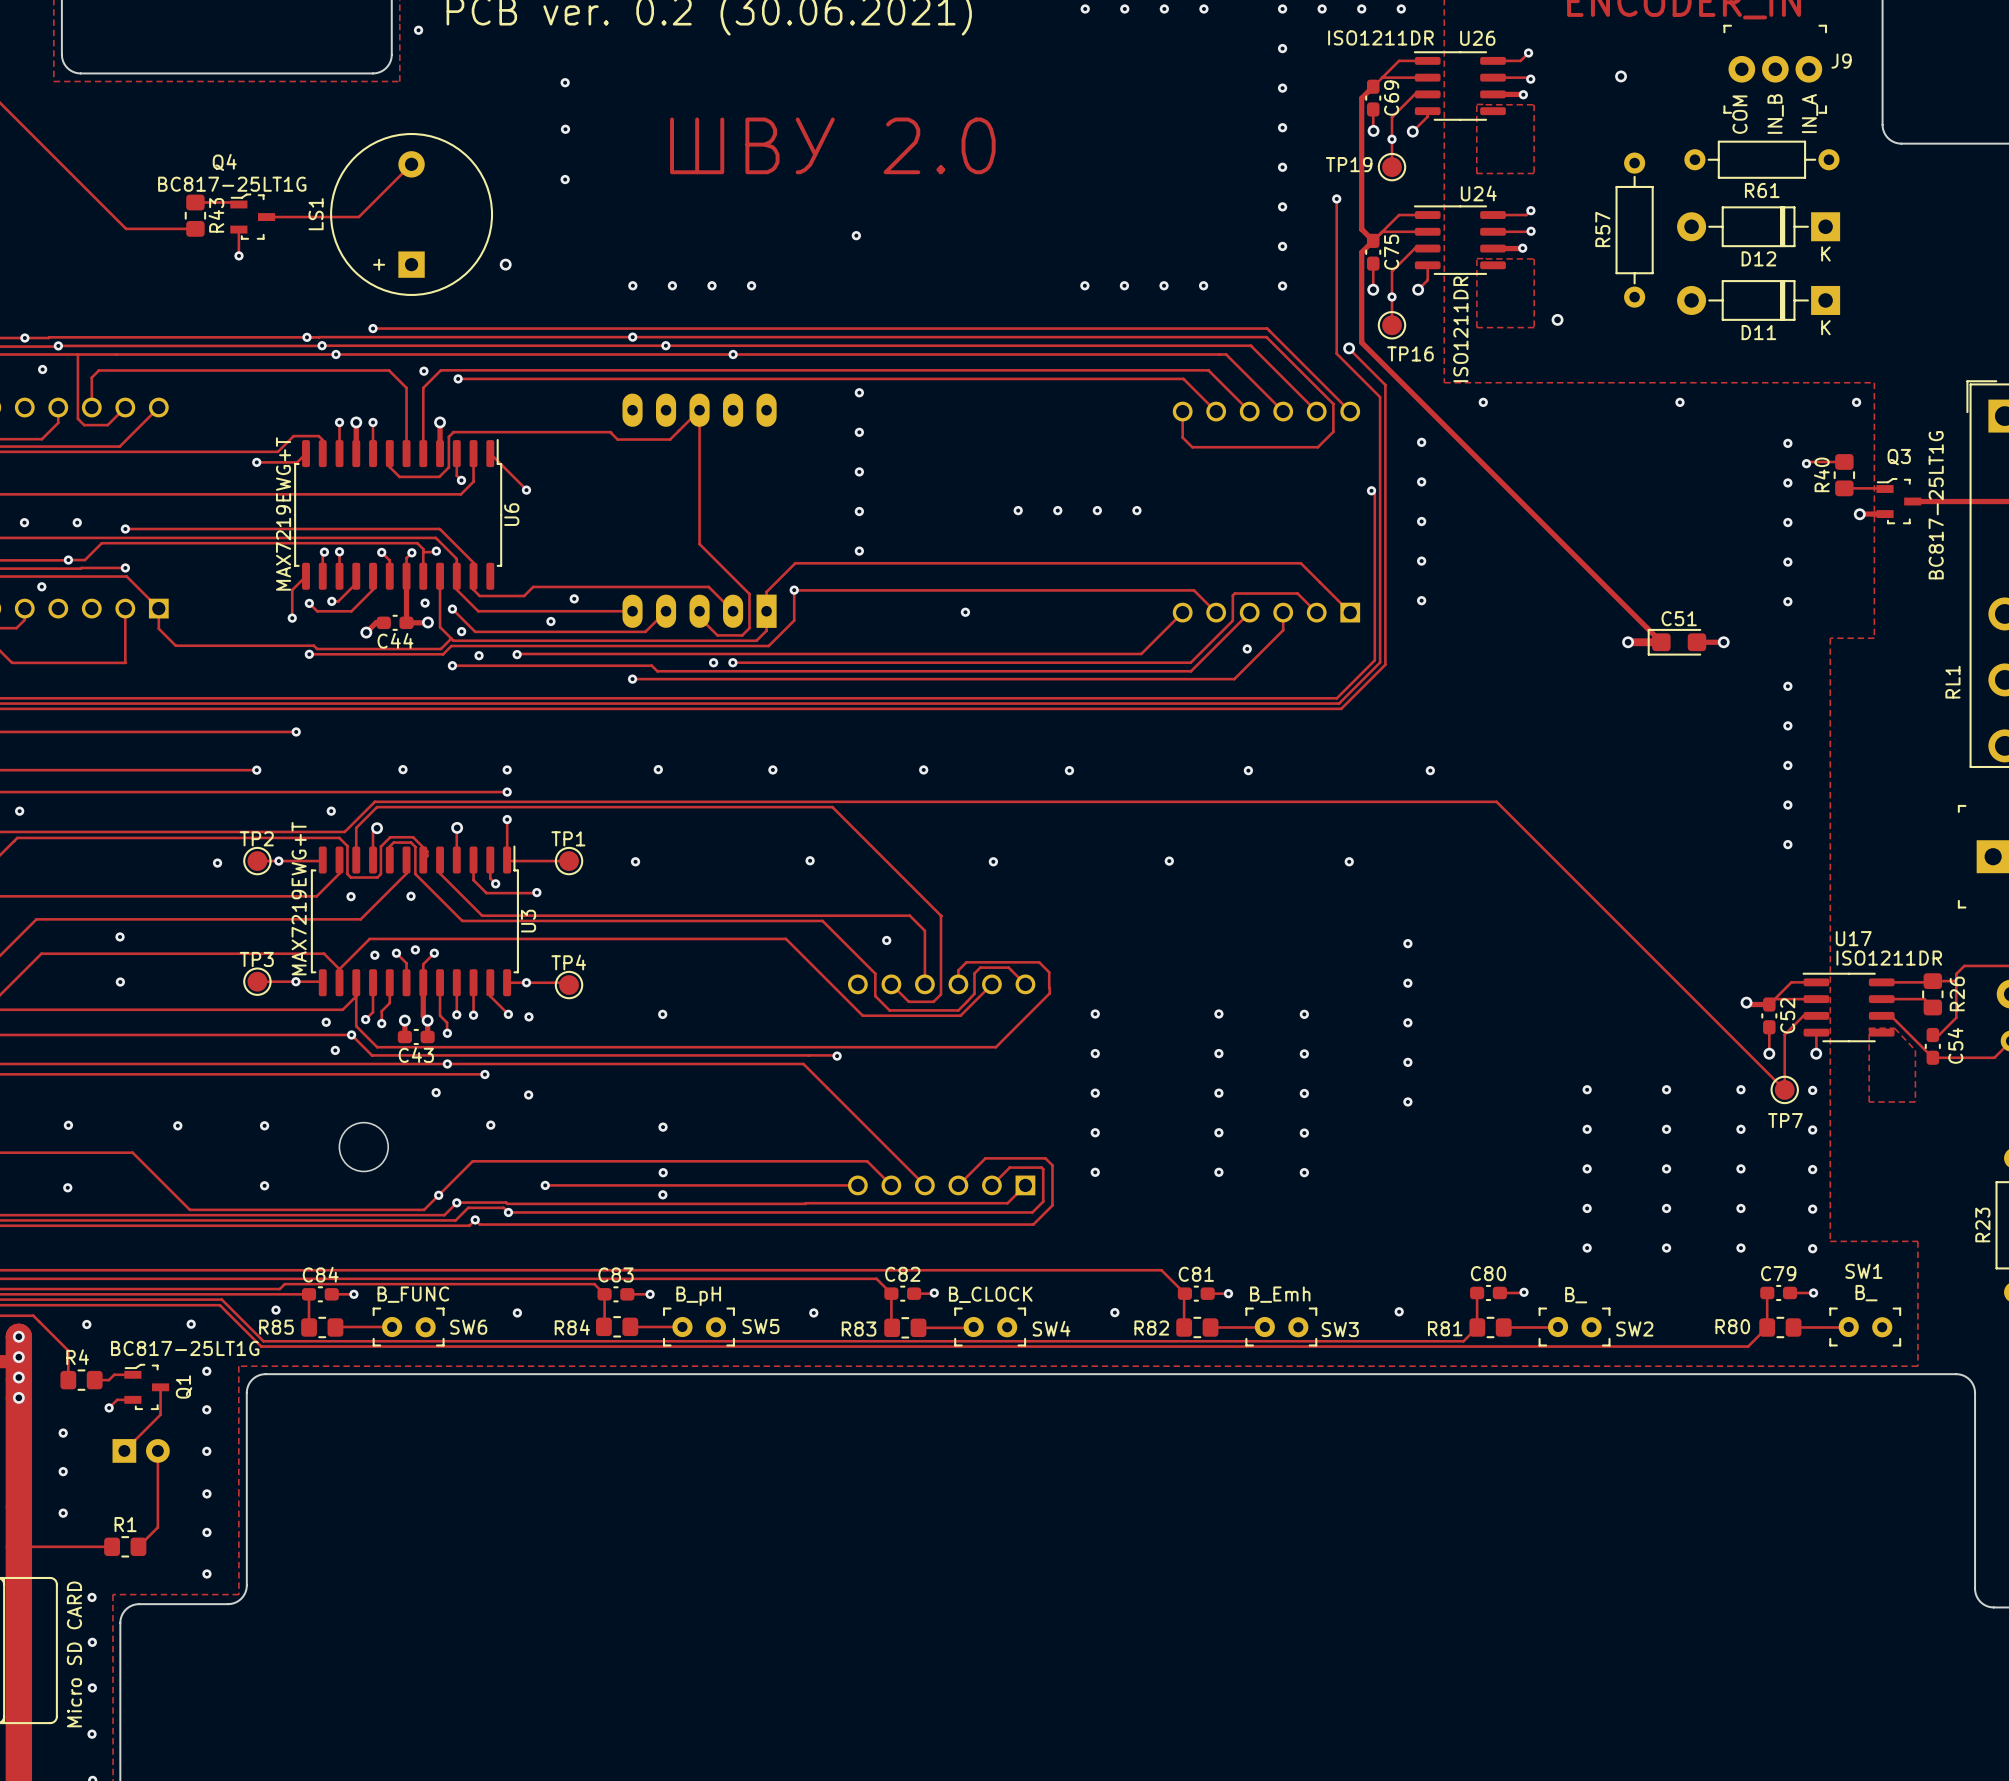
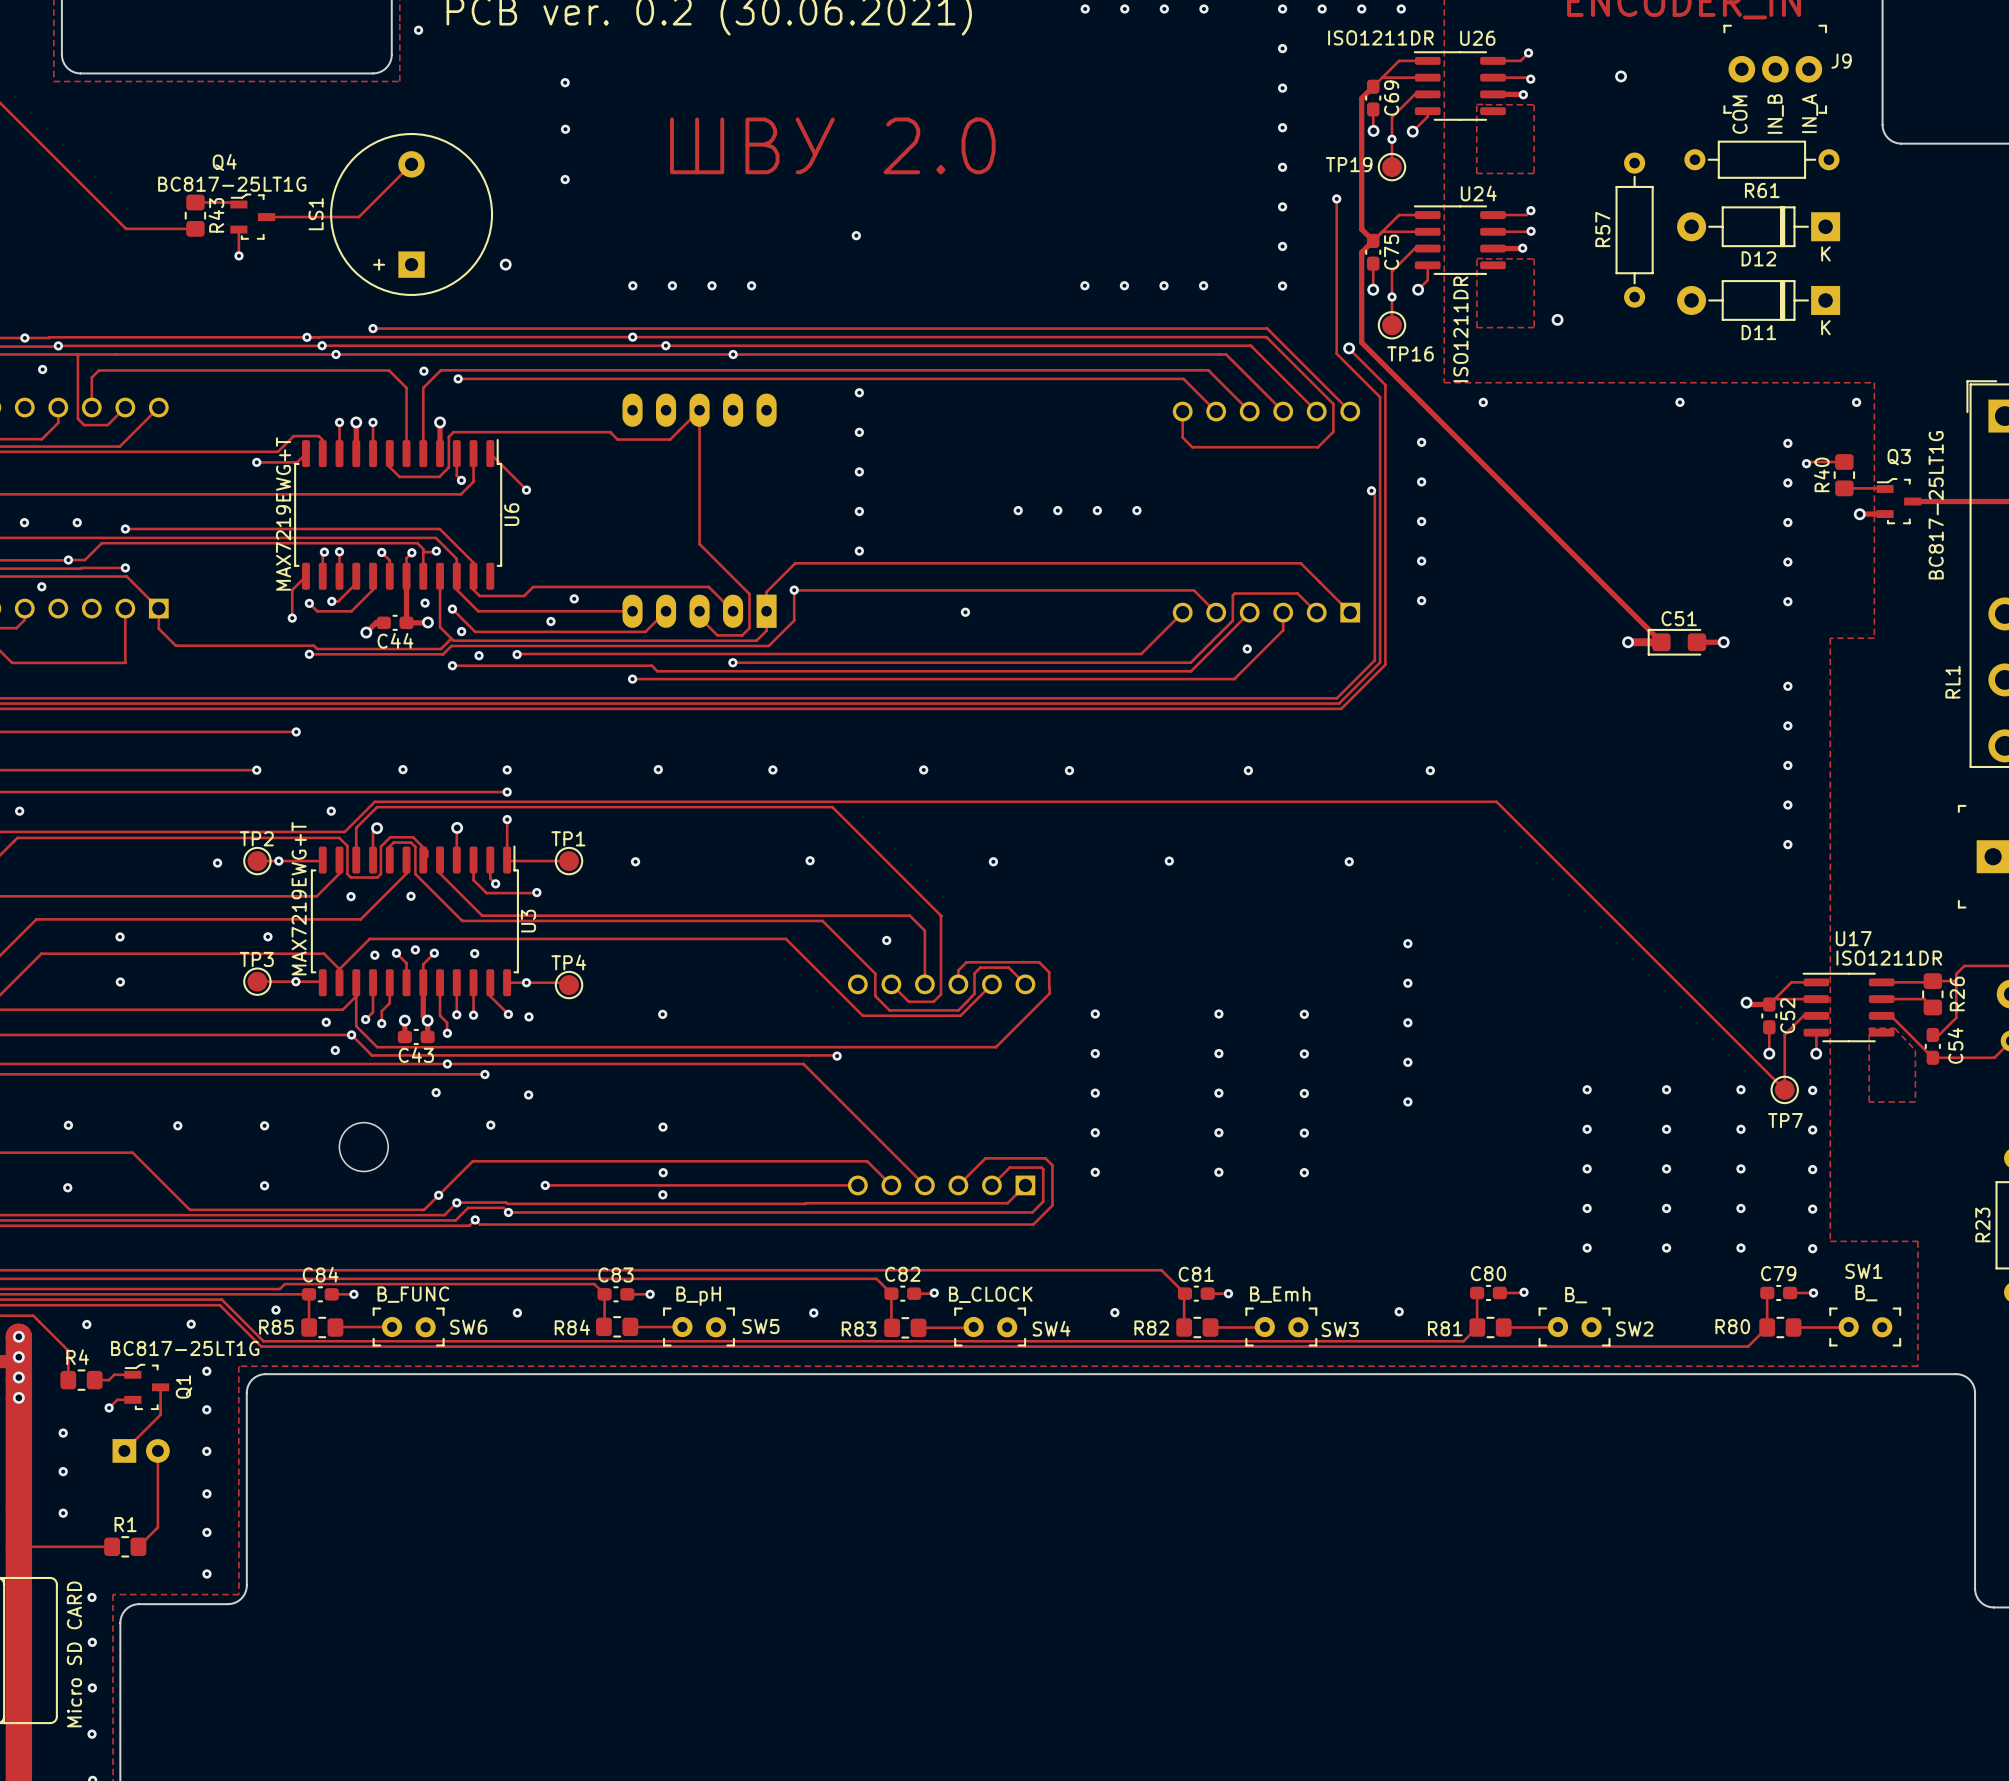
via: (713, 662) -> none
via: none -> (267, 936)
via: none -> (474, 953)

